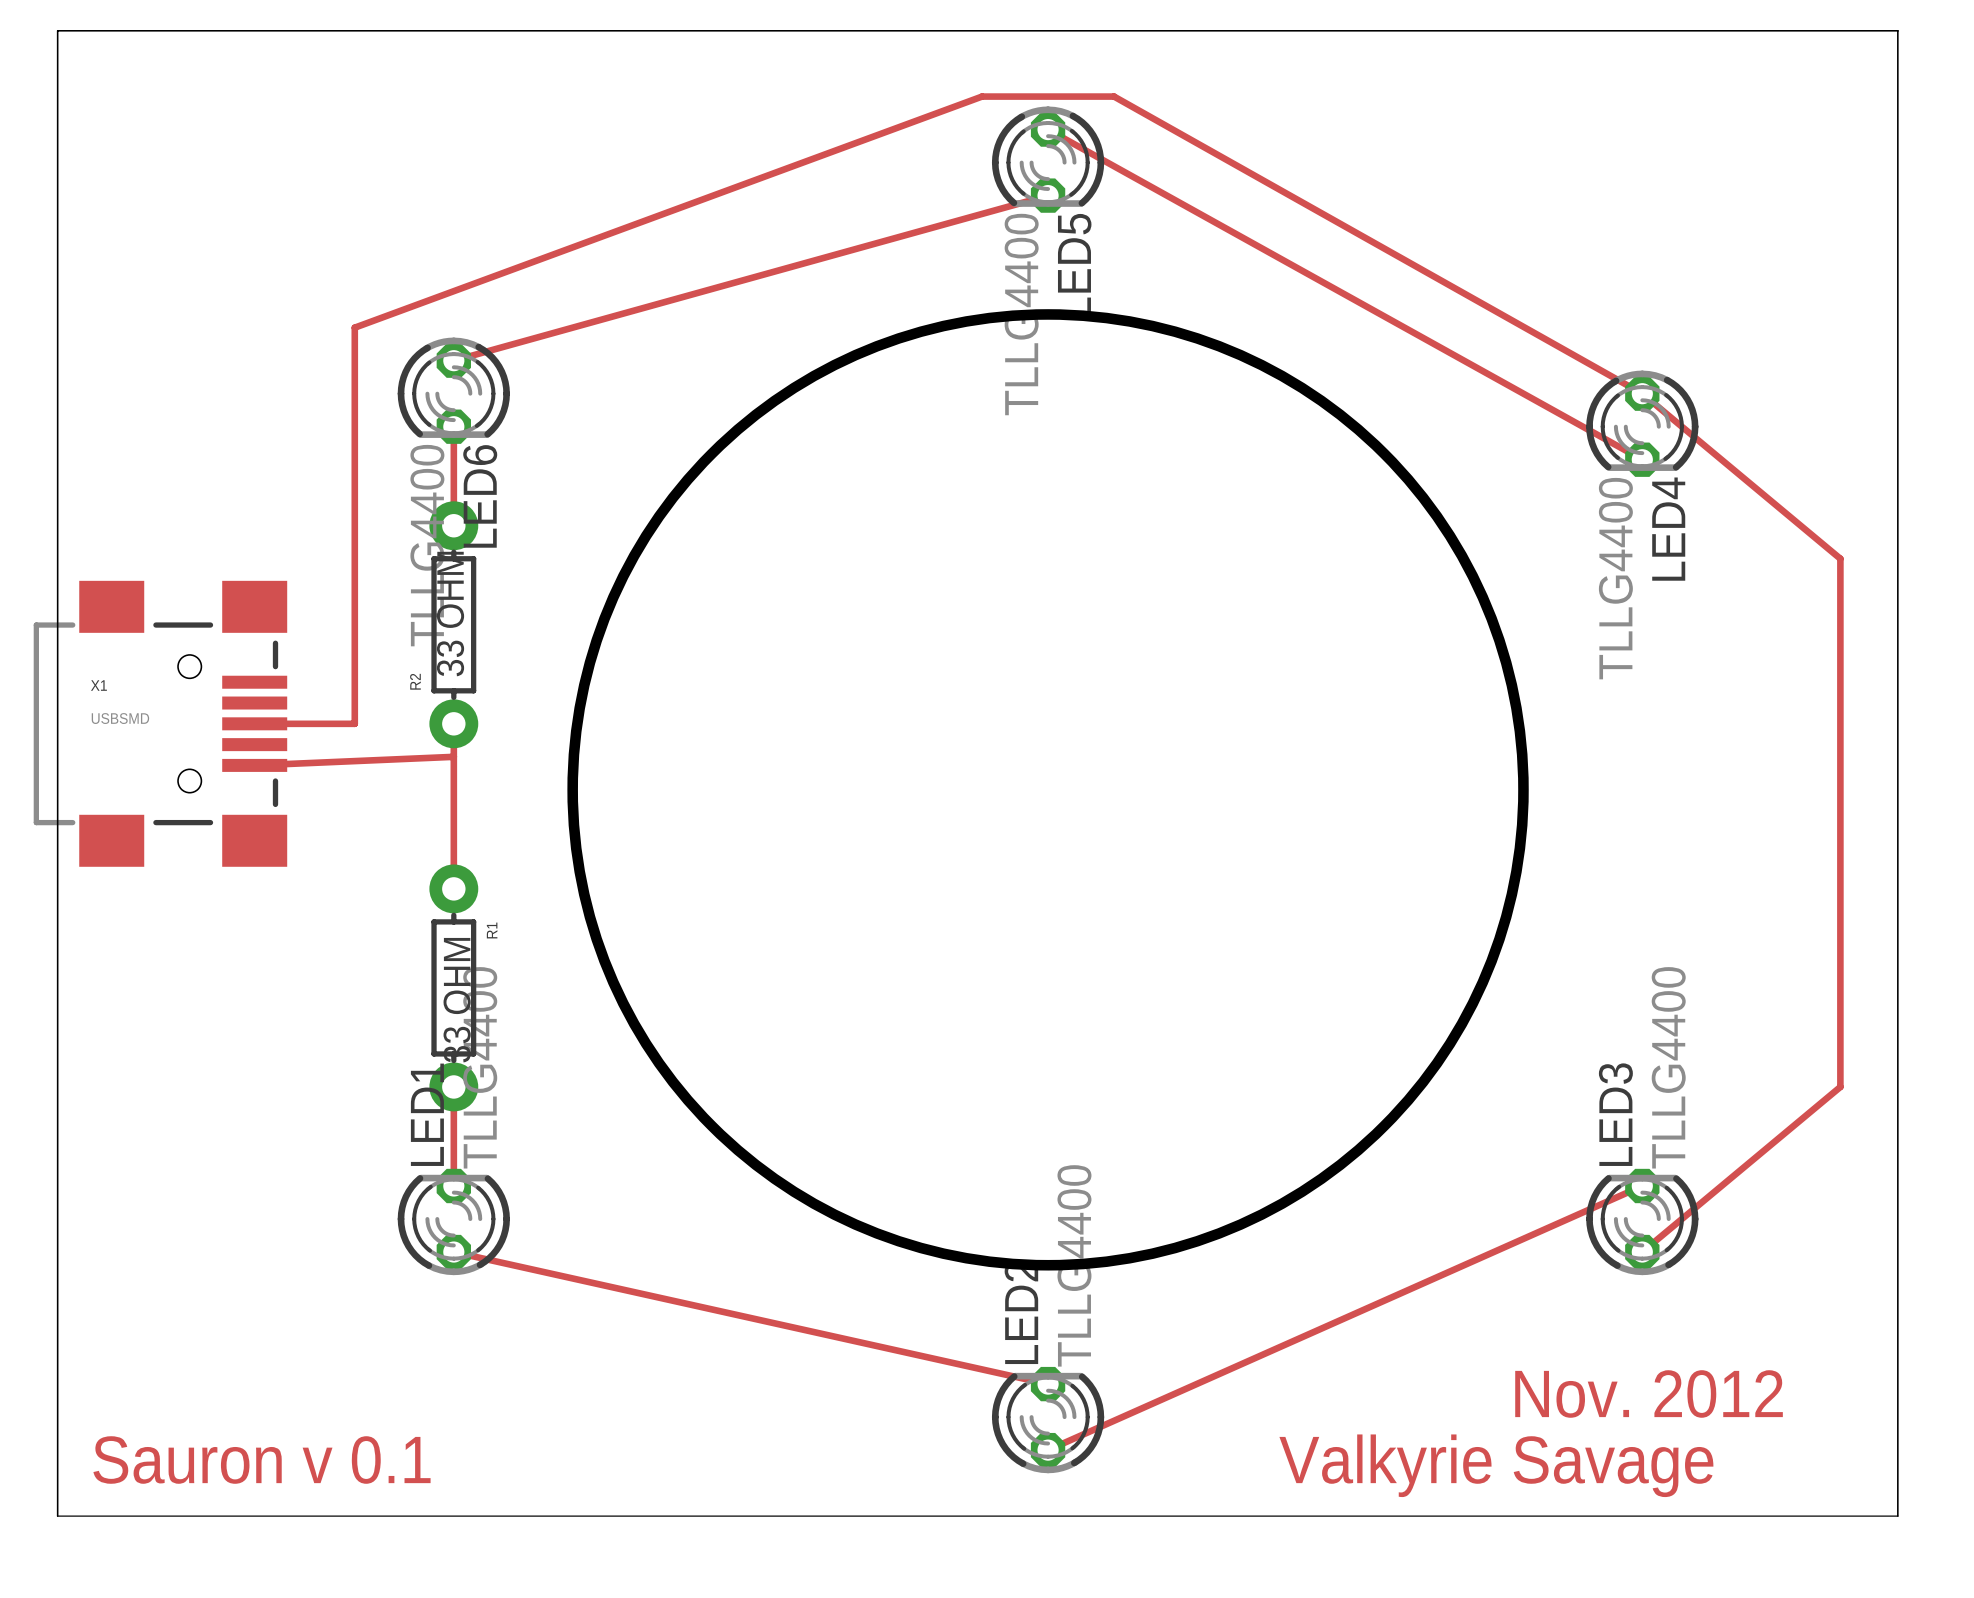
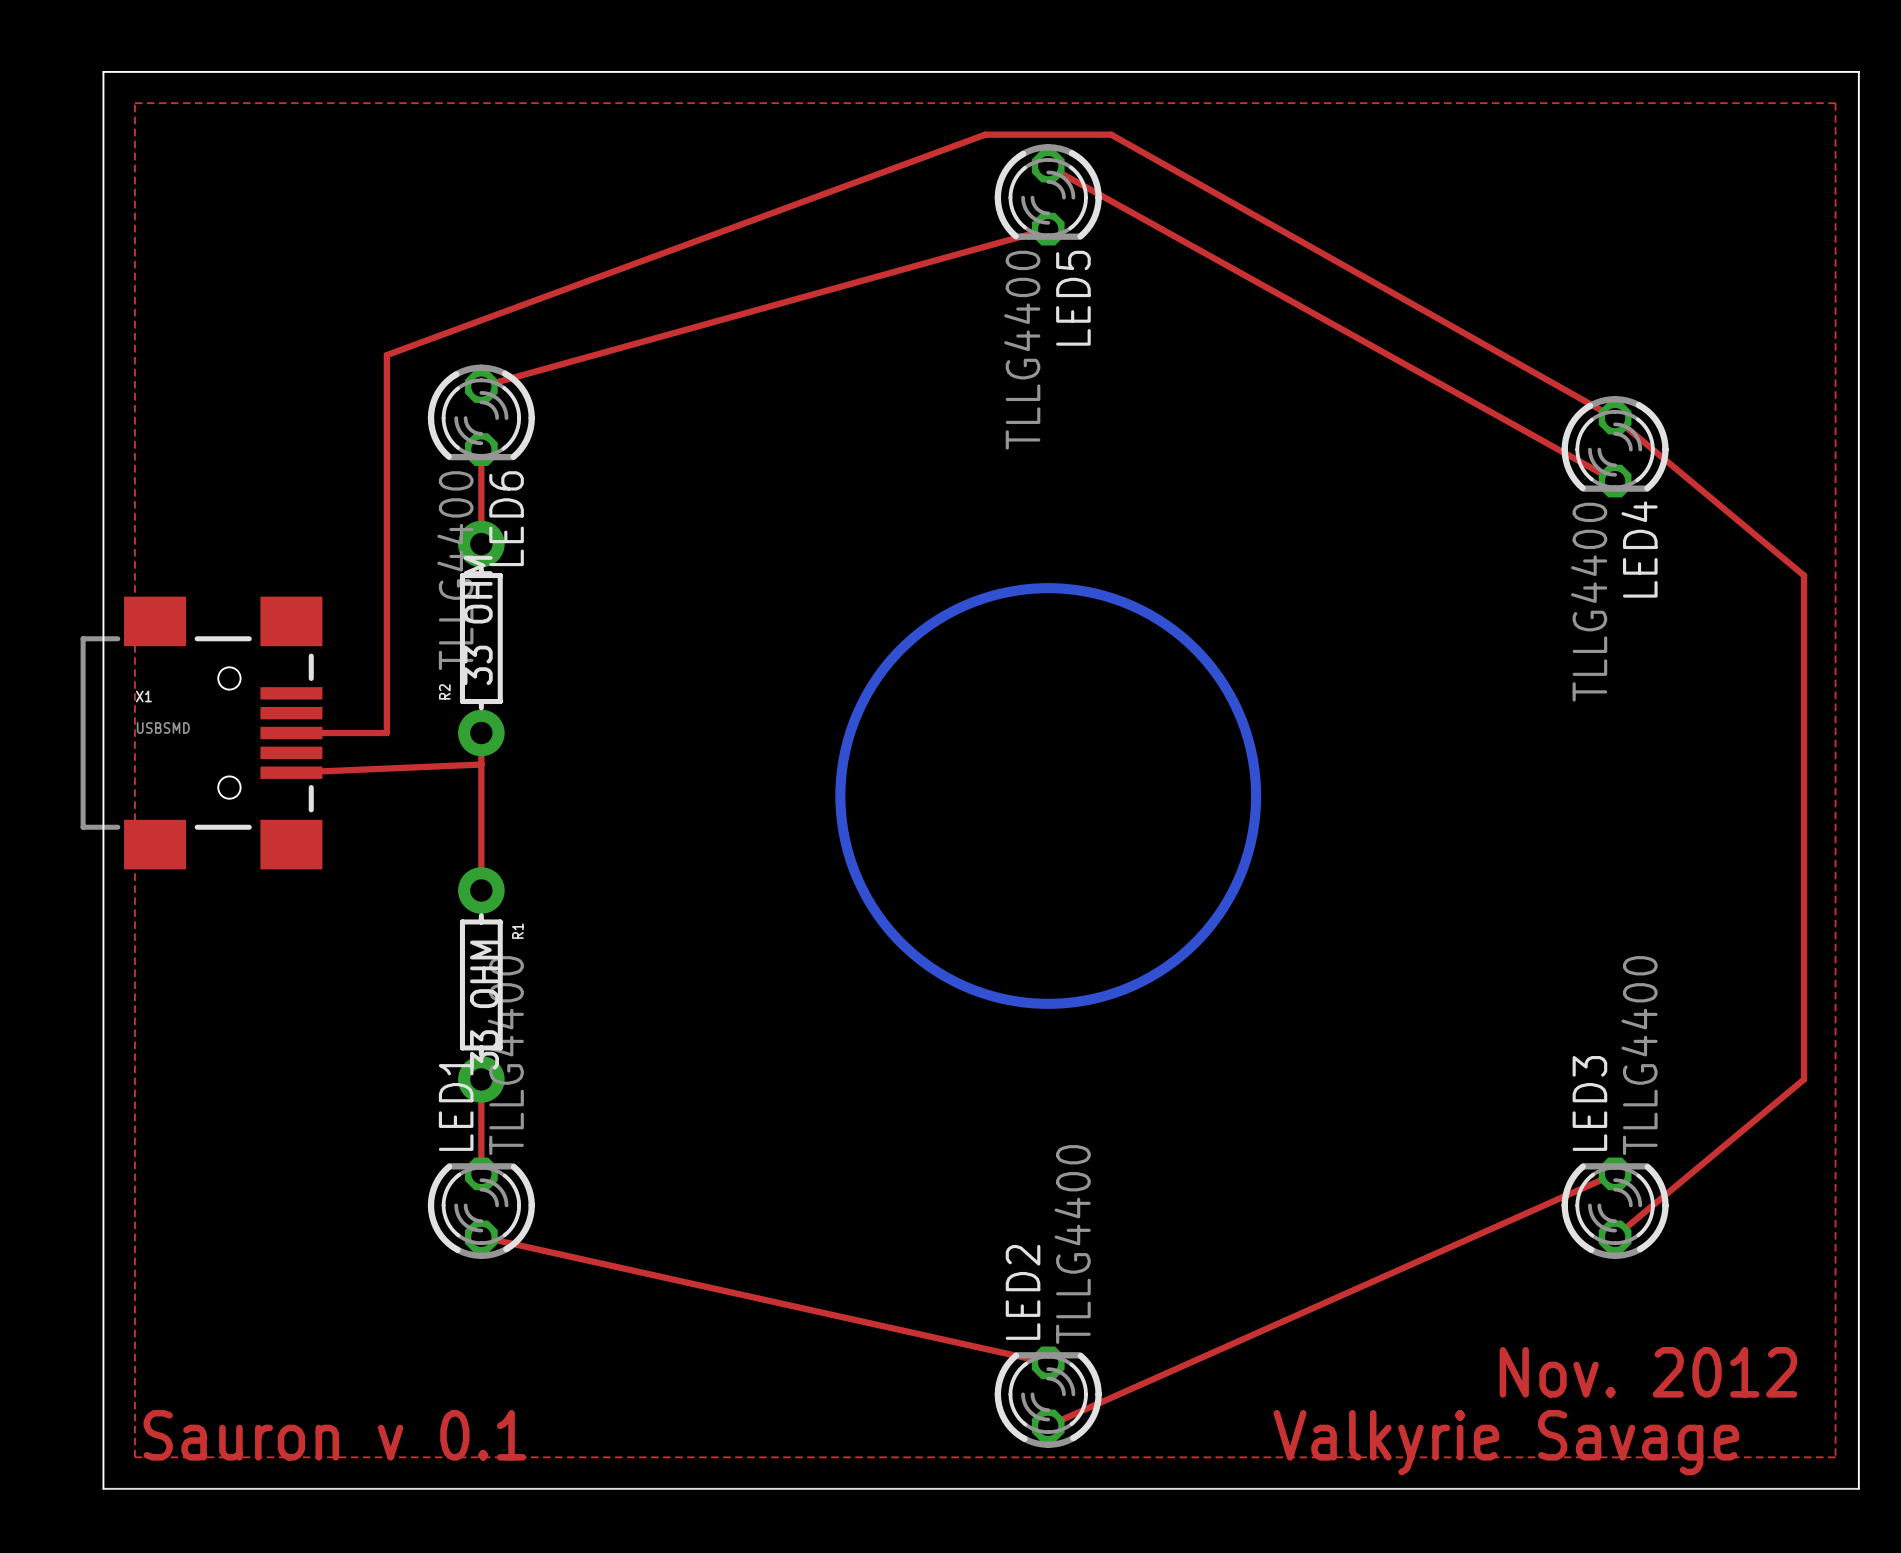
top zone outline: none -> (134, 103) (1835, 103) (1835, 1457) (134, 1457) (134, 103)
round board edge: [567, 309, 1529, 1271] -> none
drawing: none -> [835, 583, 1262, 1009]

